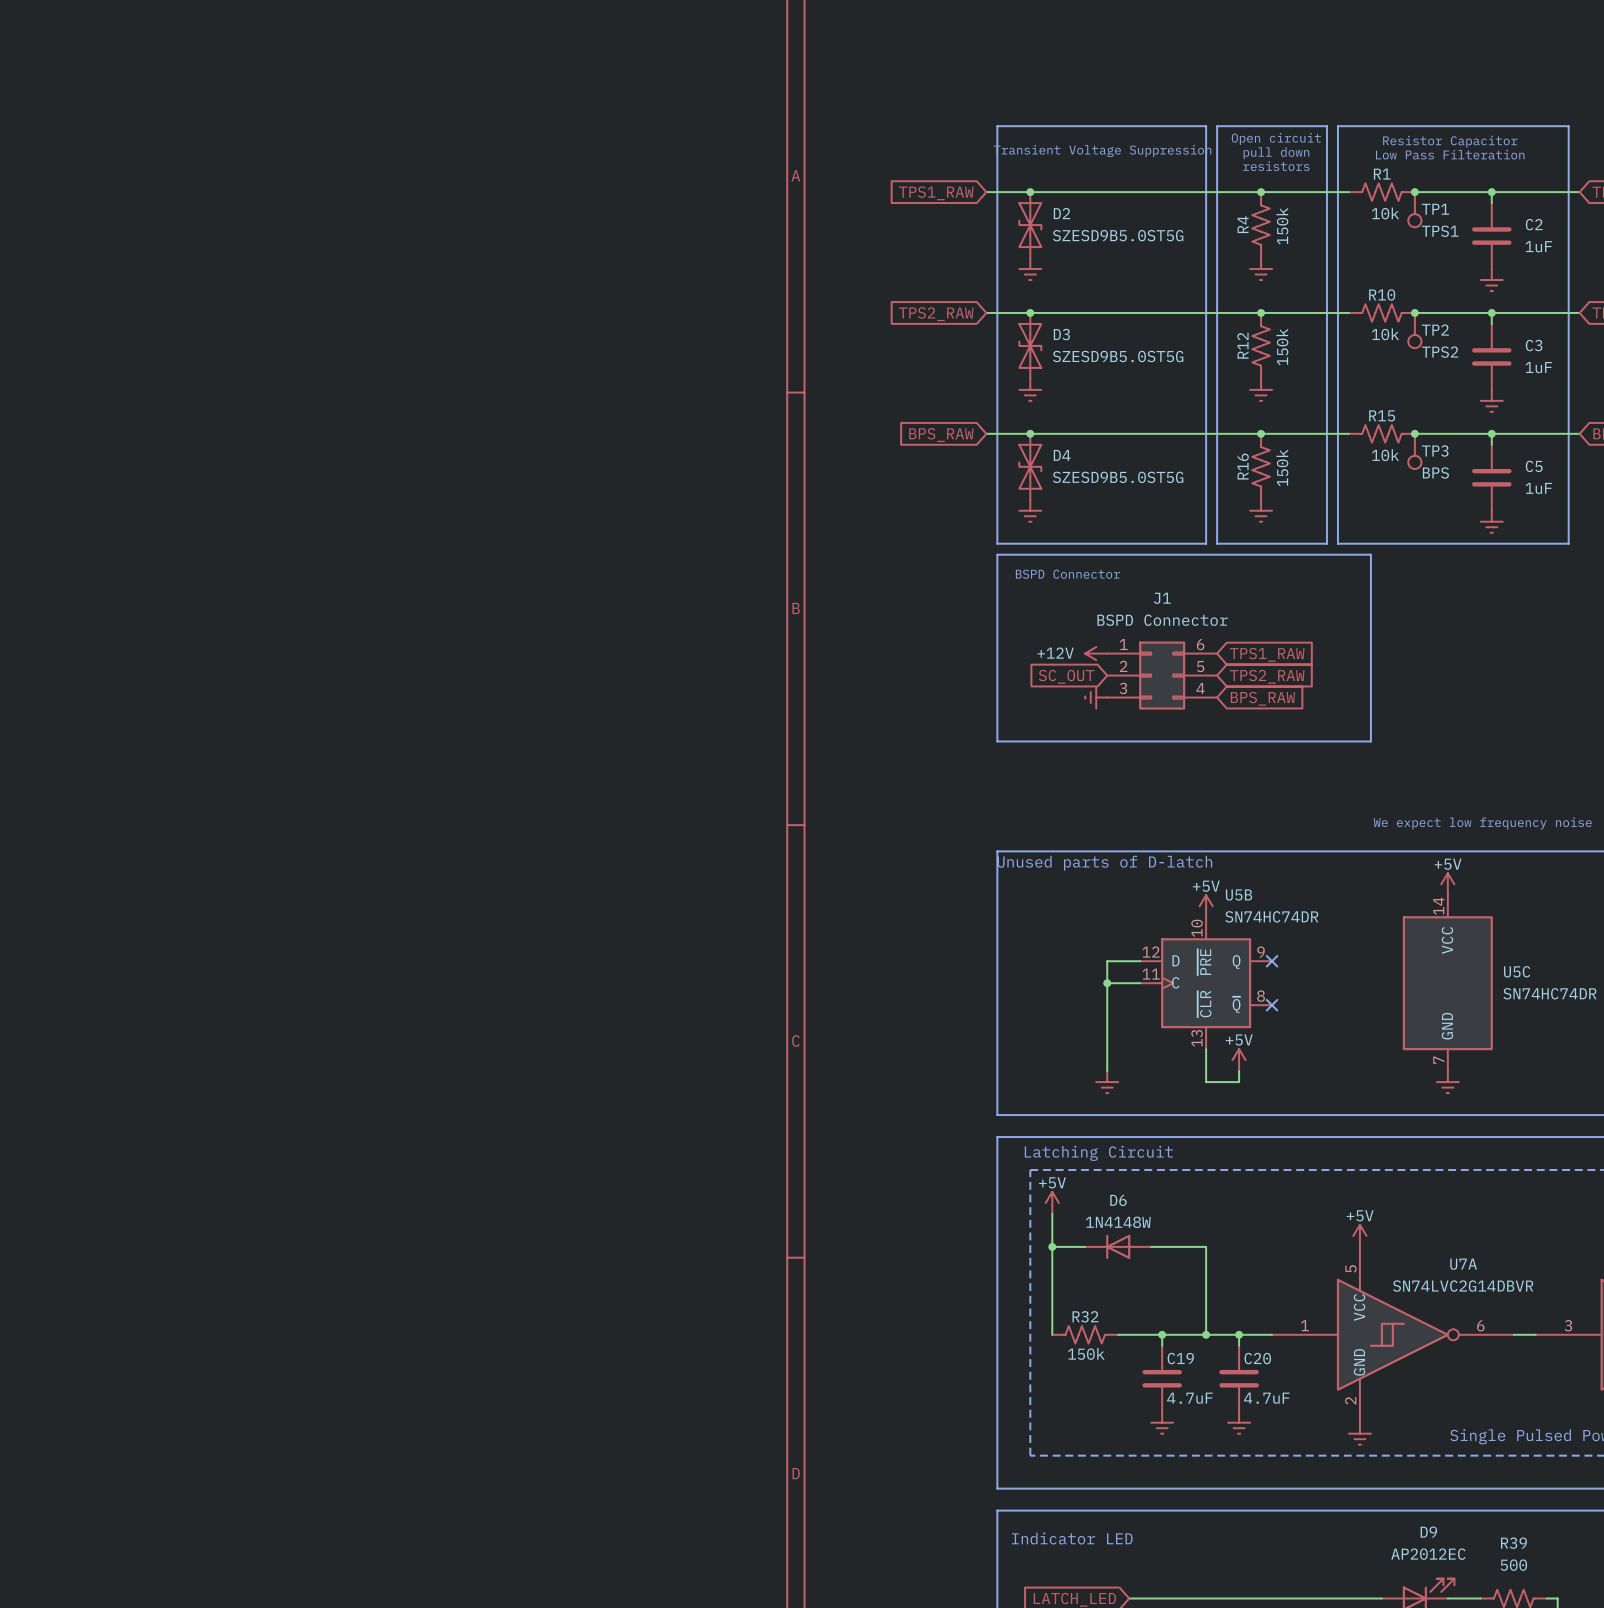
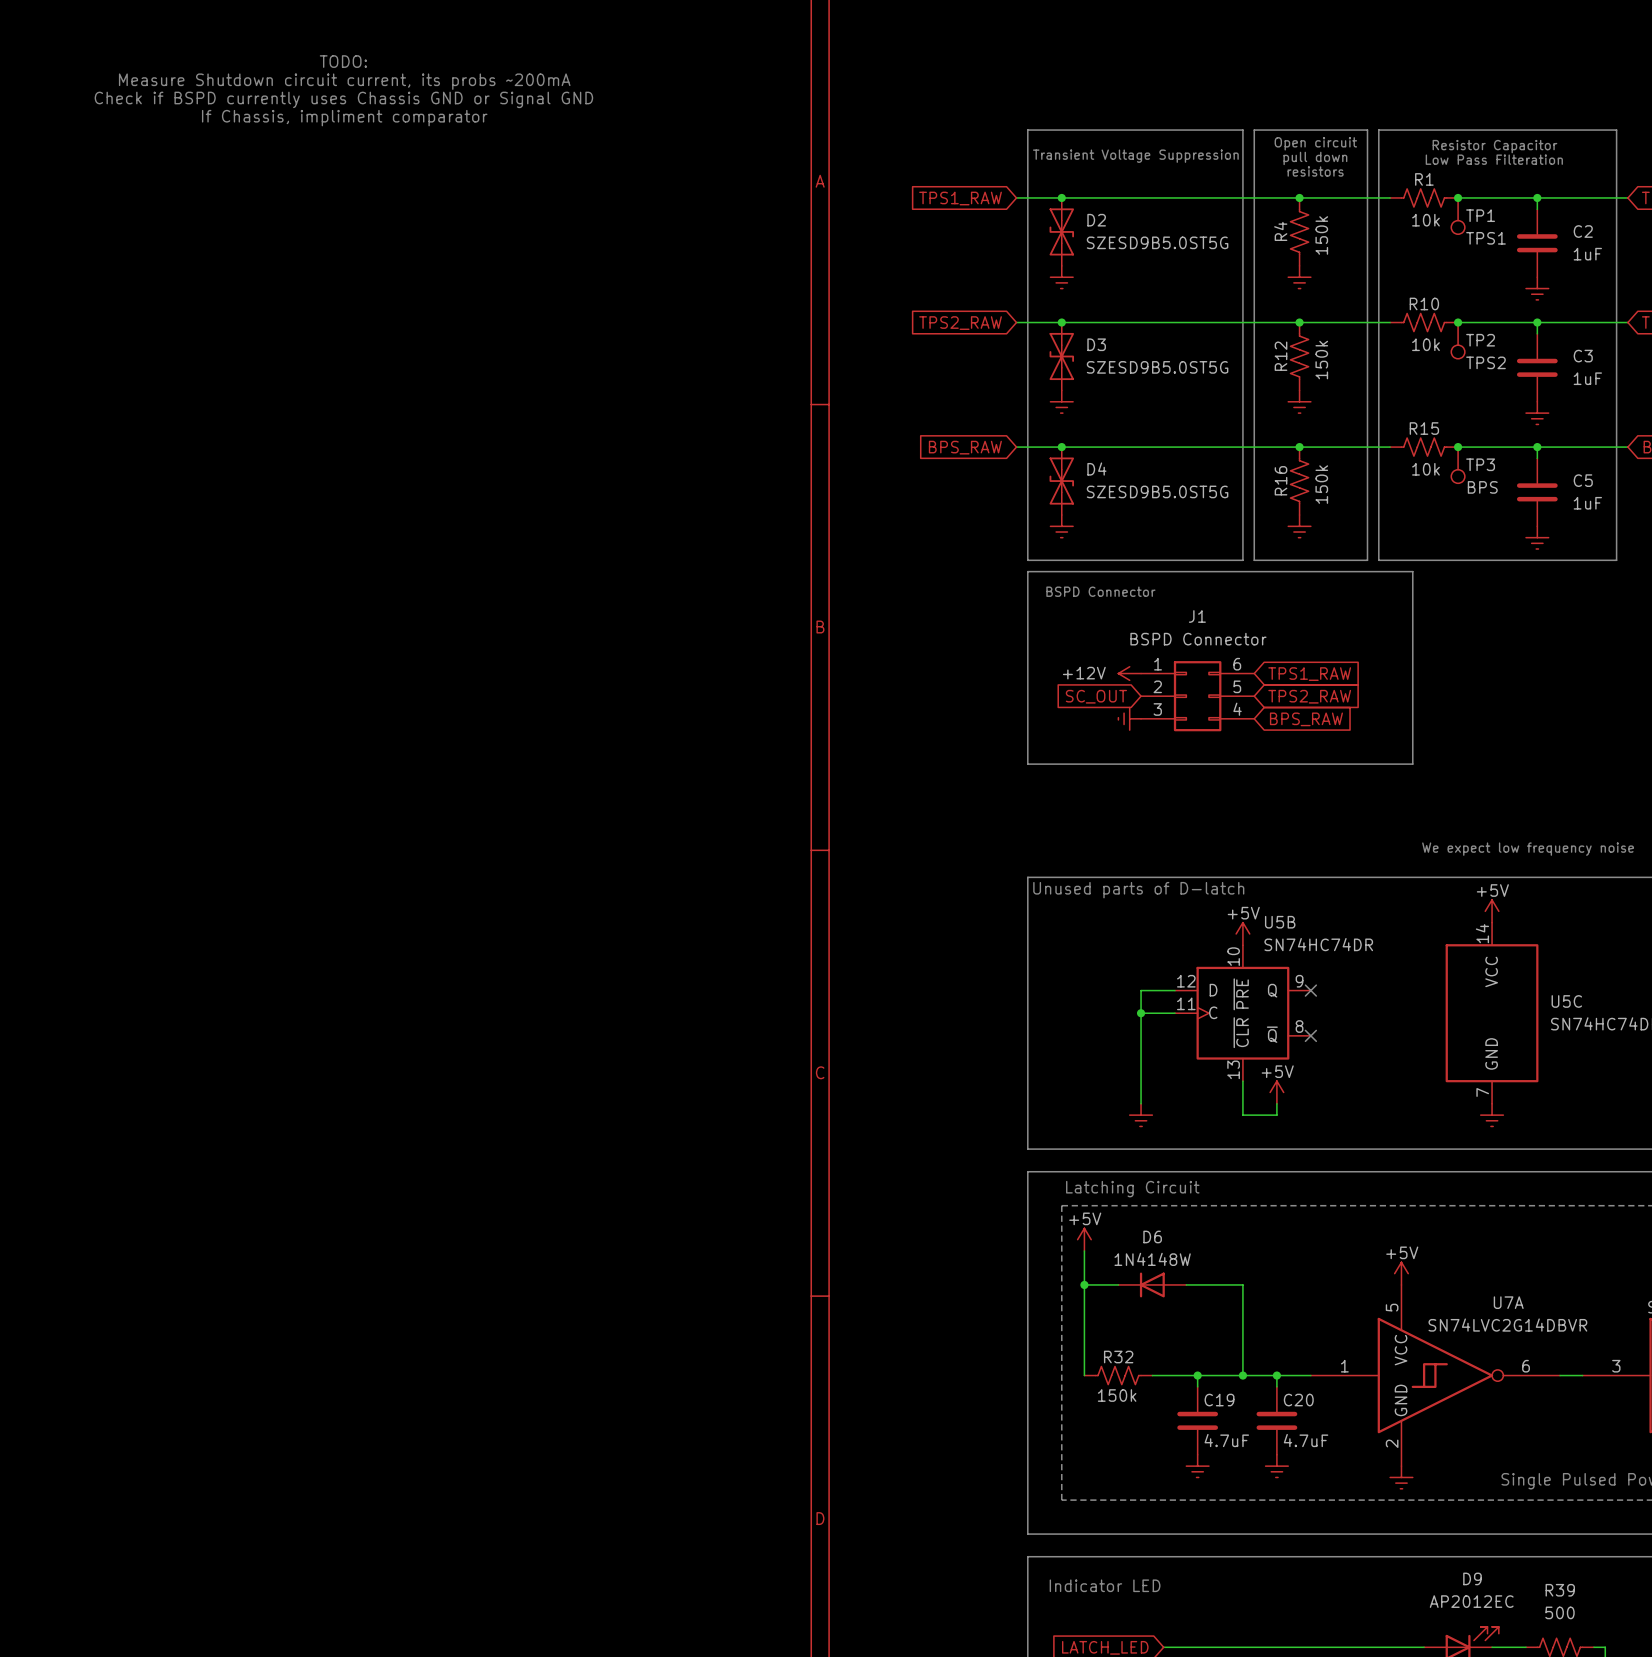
text: none -> TODO: (343, 61)
text: none -> Measure Shutdown circuit current, its probs ~200mA (344, 81)
text: none -> Check if BSPD currently uses Chassis GND or Signal GND (343, 99)
text: none -> If Chassis, impliment comparator (344, 118)

